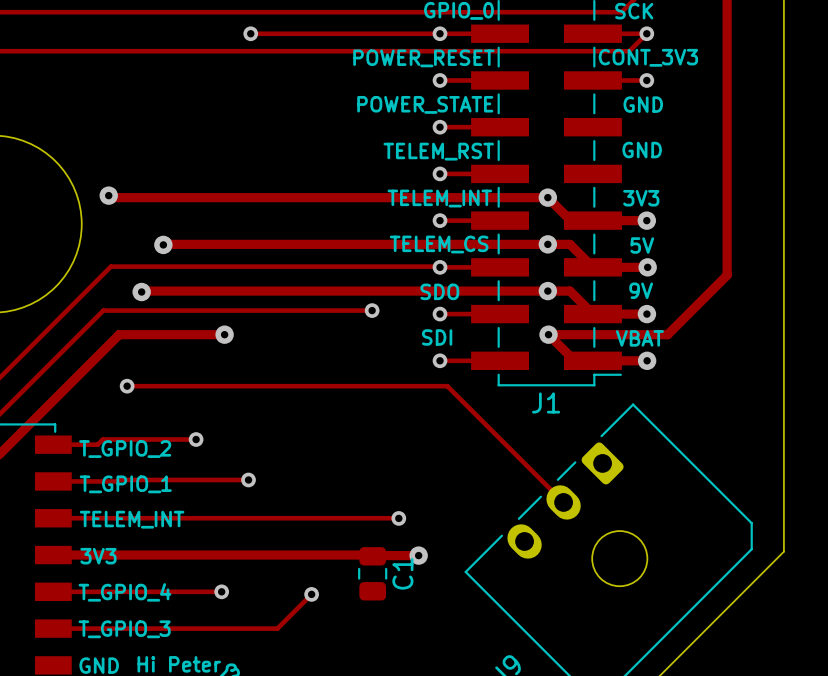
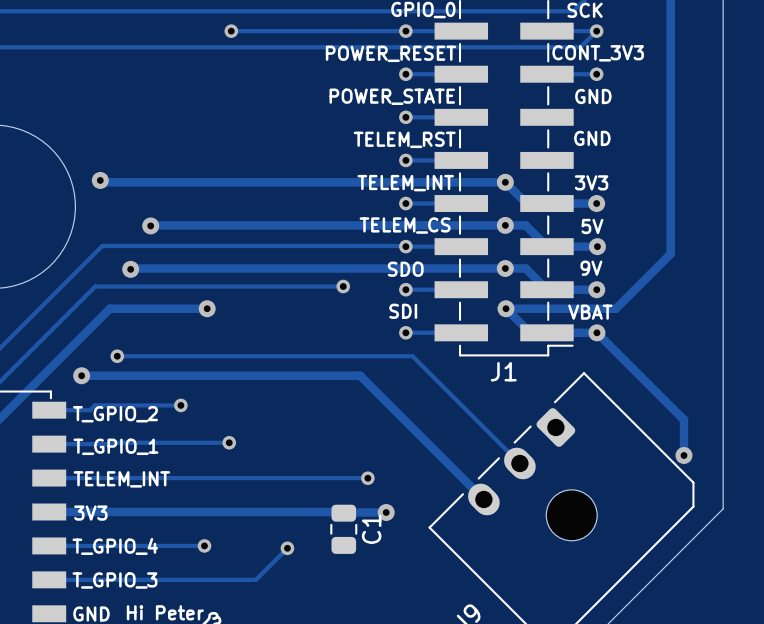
track: none -> (596, 332) (683, 419) (683, 455)
track: none -> (81, 375) (360, 375) (483, 499)
via: none -> (81, 375)
via: none -> (683, 455)

